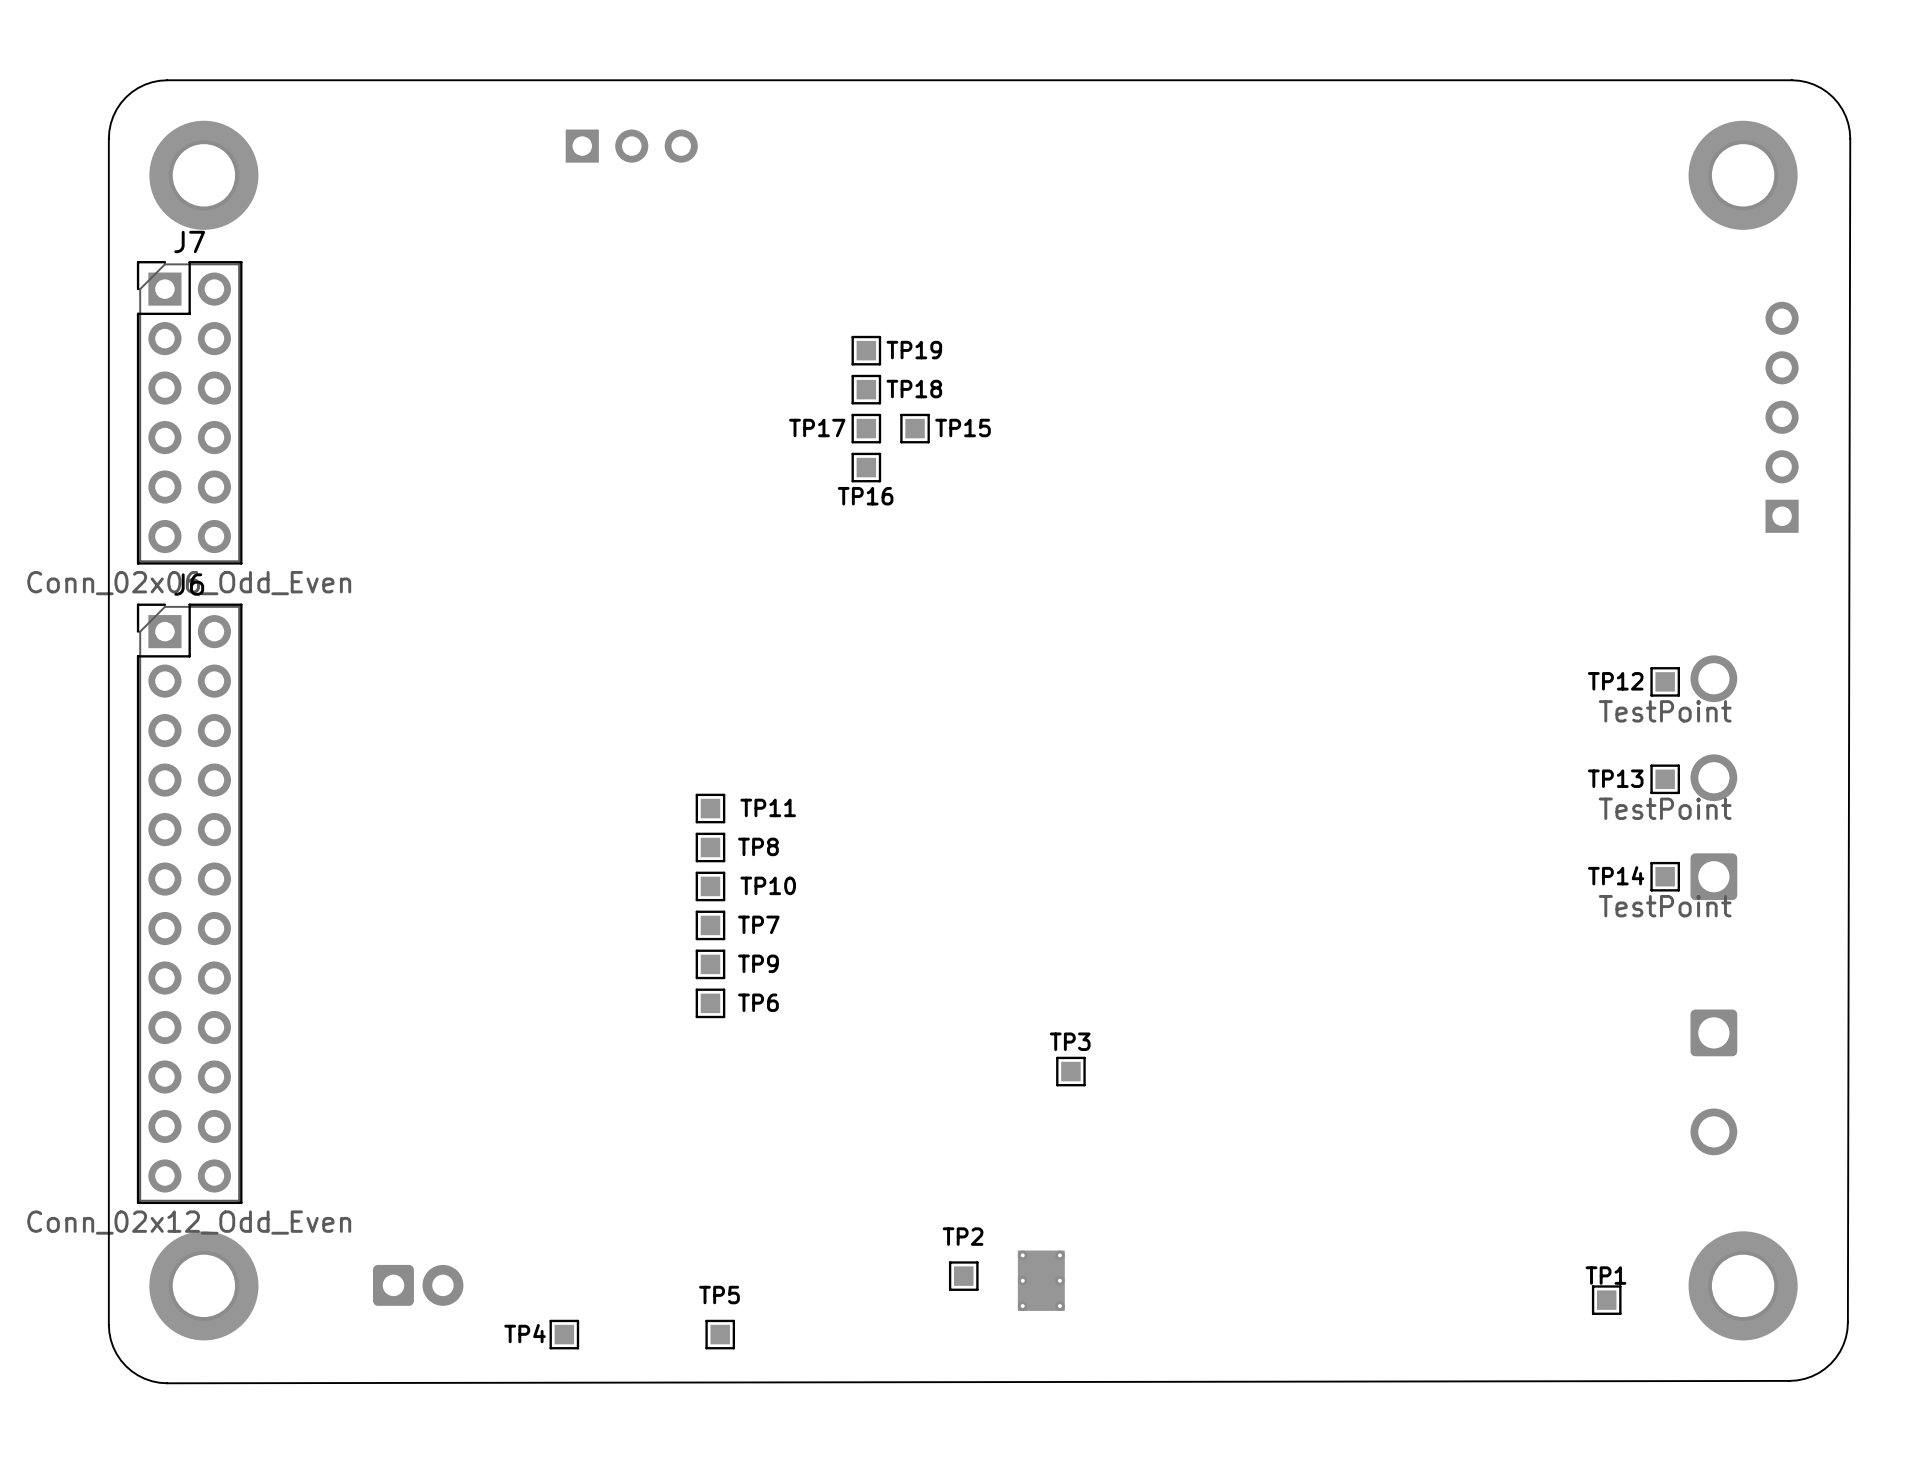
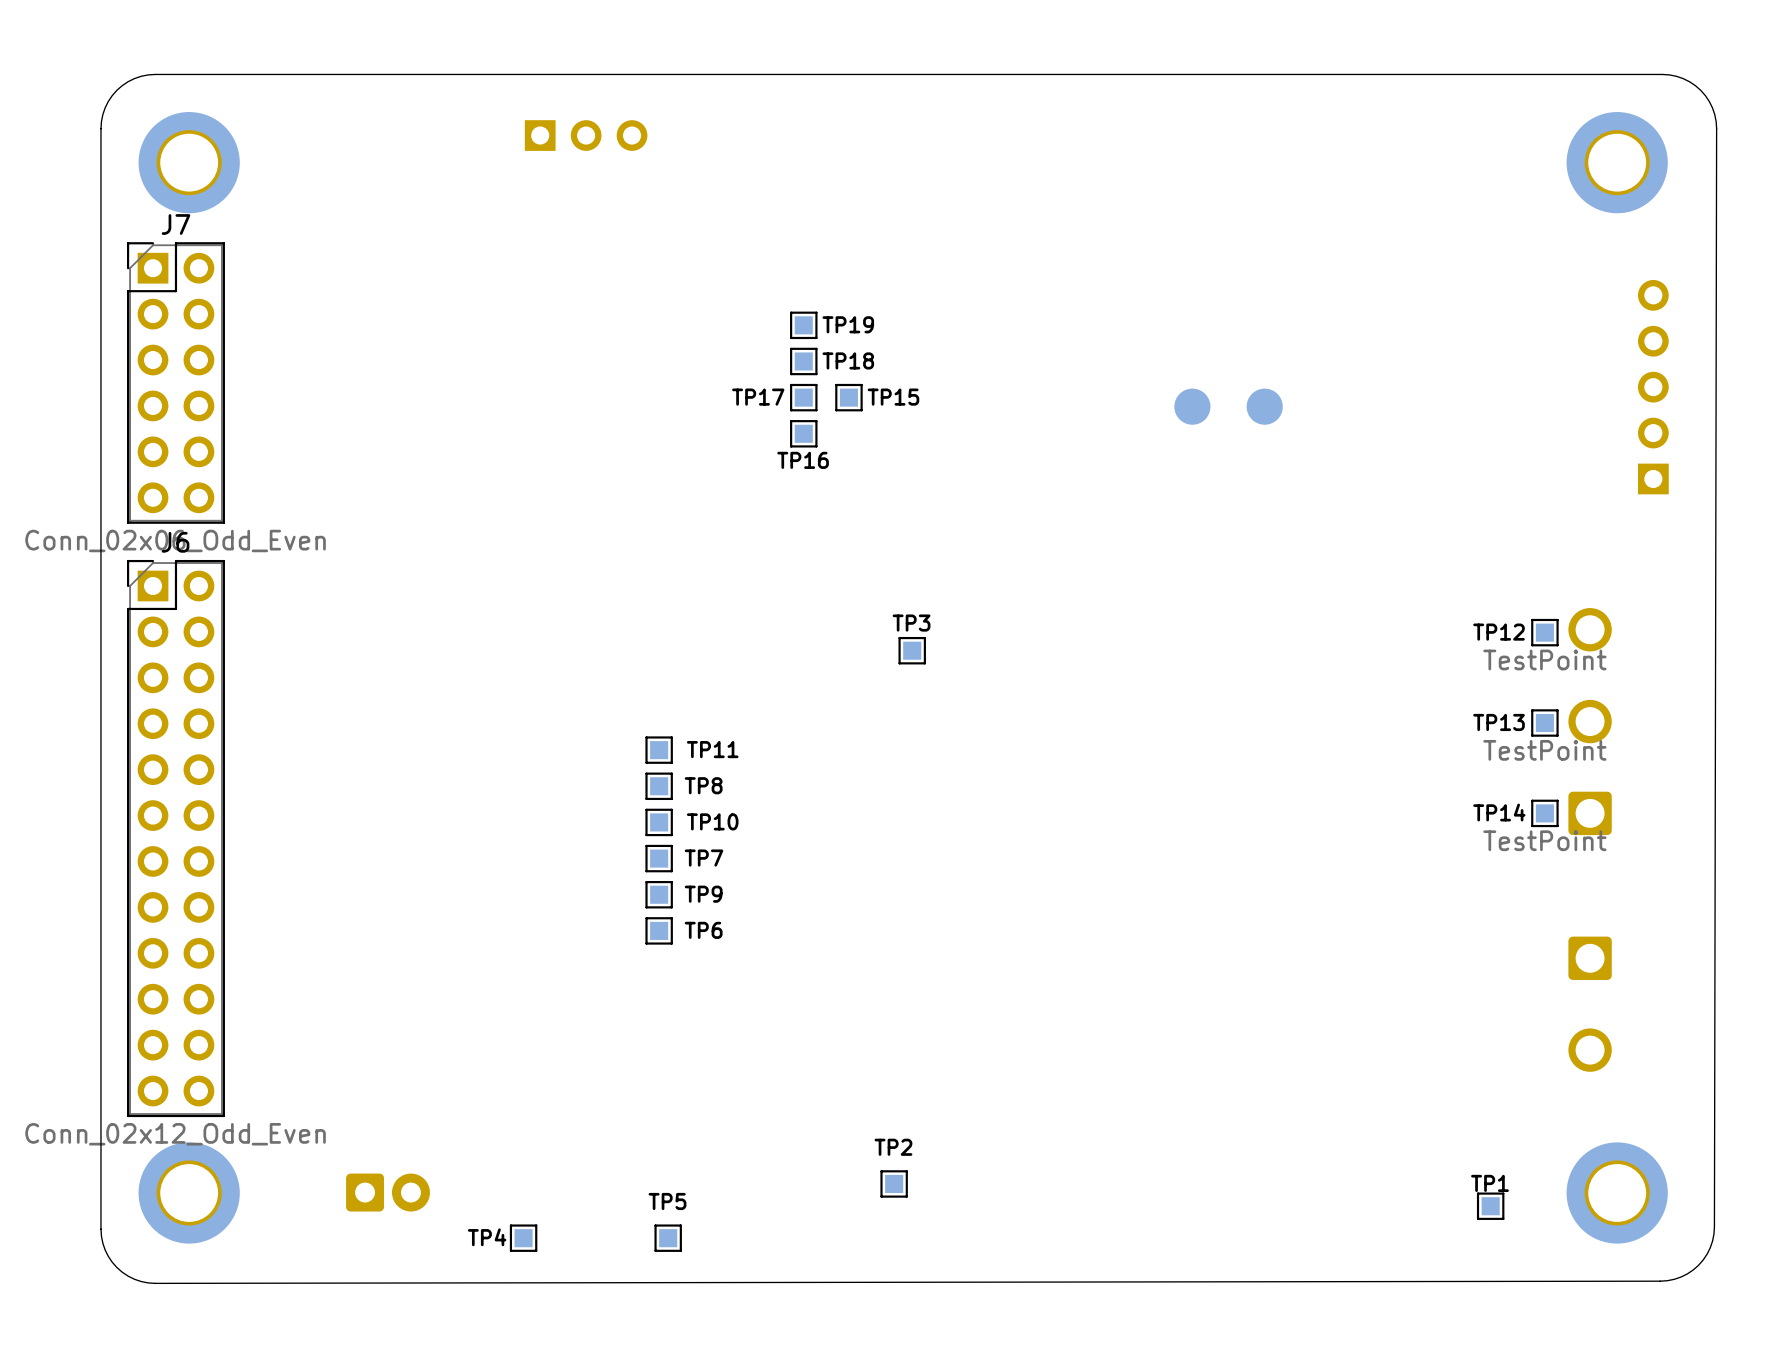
part: none -> (1228, 406)
TP3 position: (1070, 1071) -> (912, 650)
part: (1041, 1280) -> none

